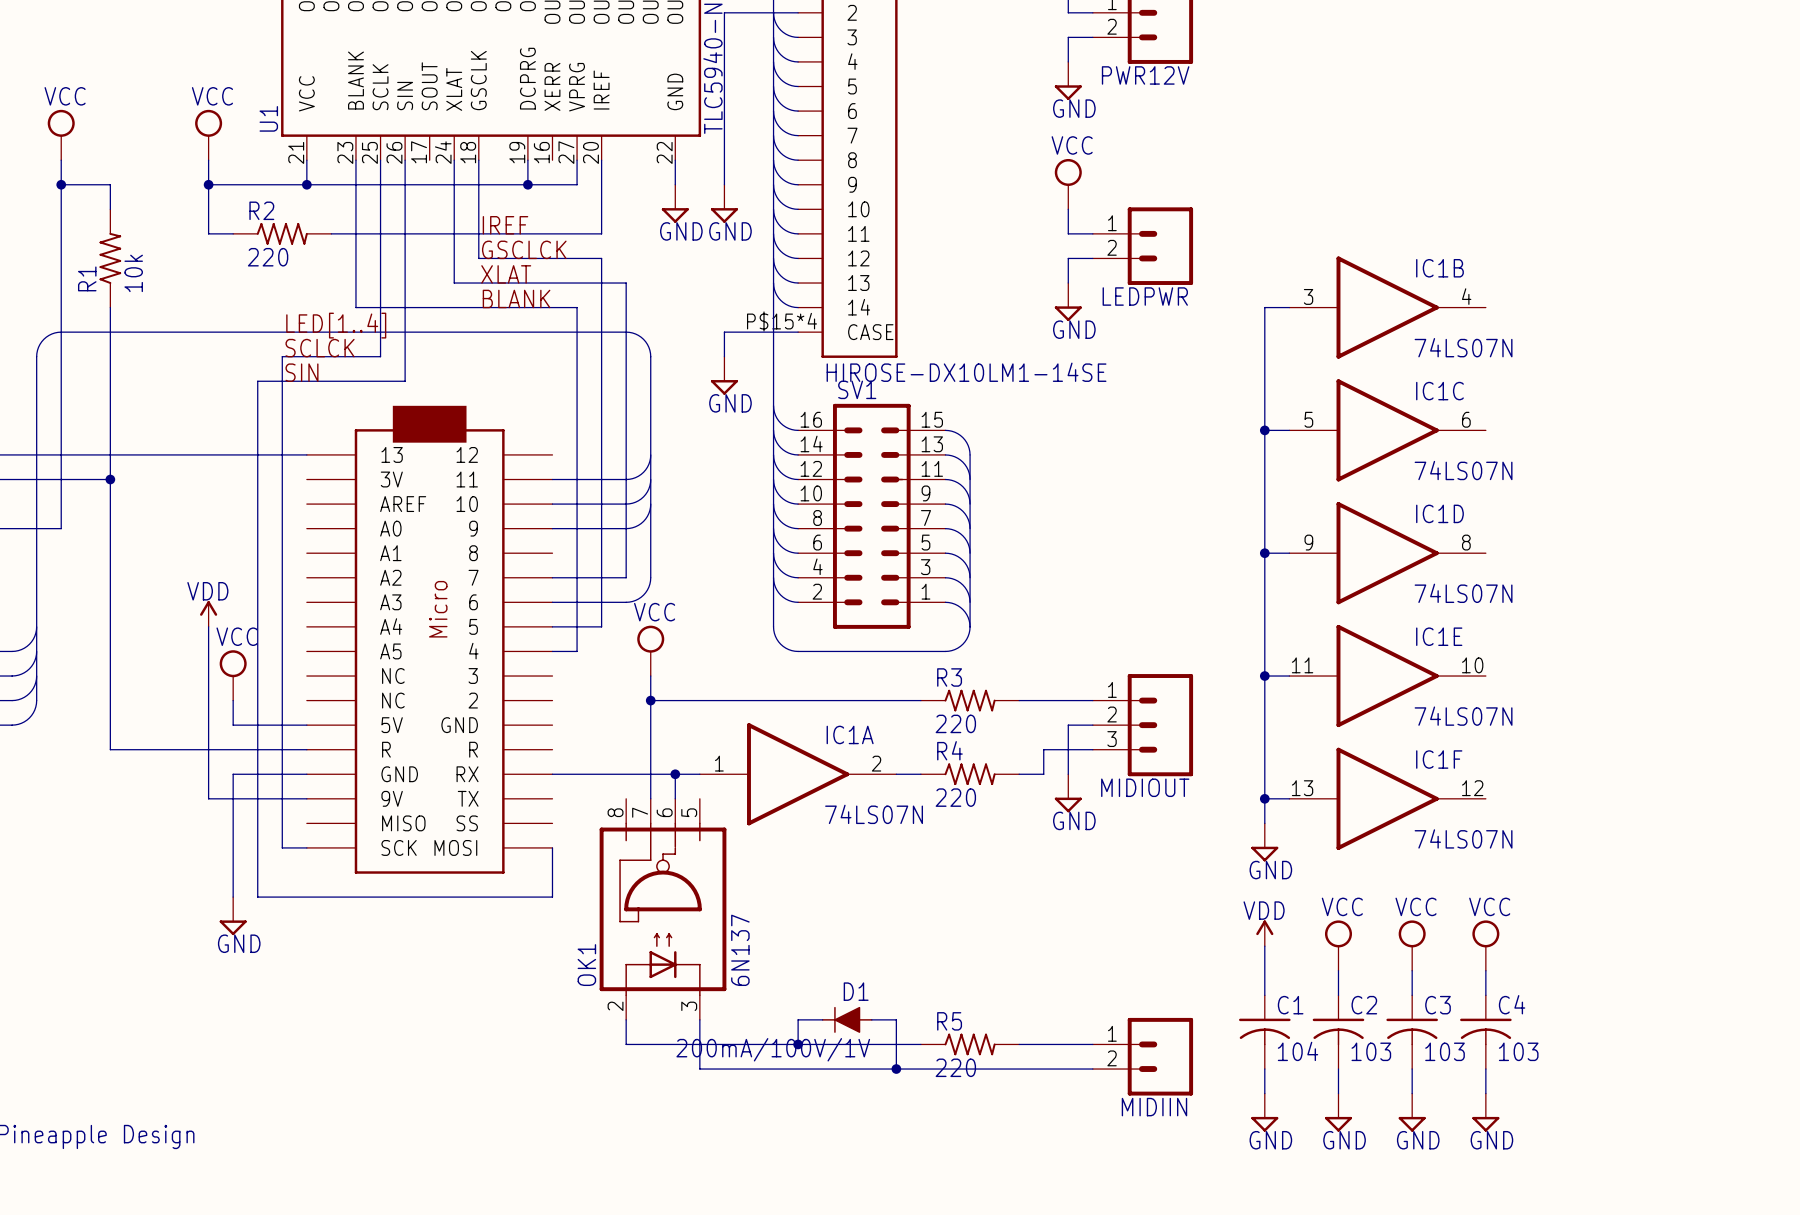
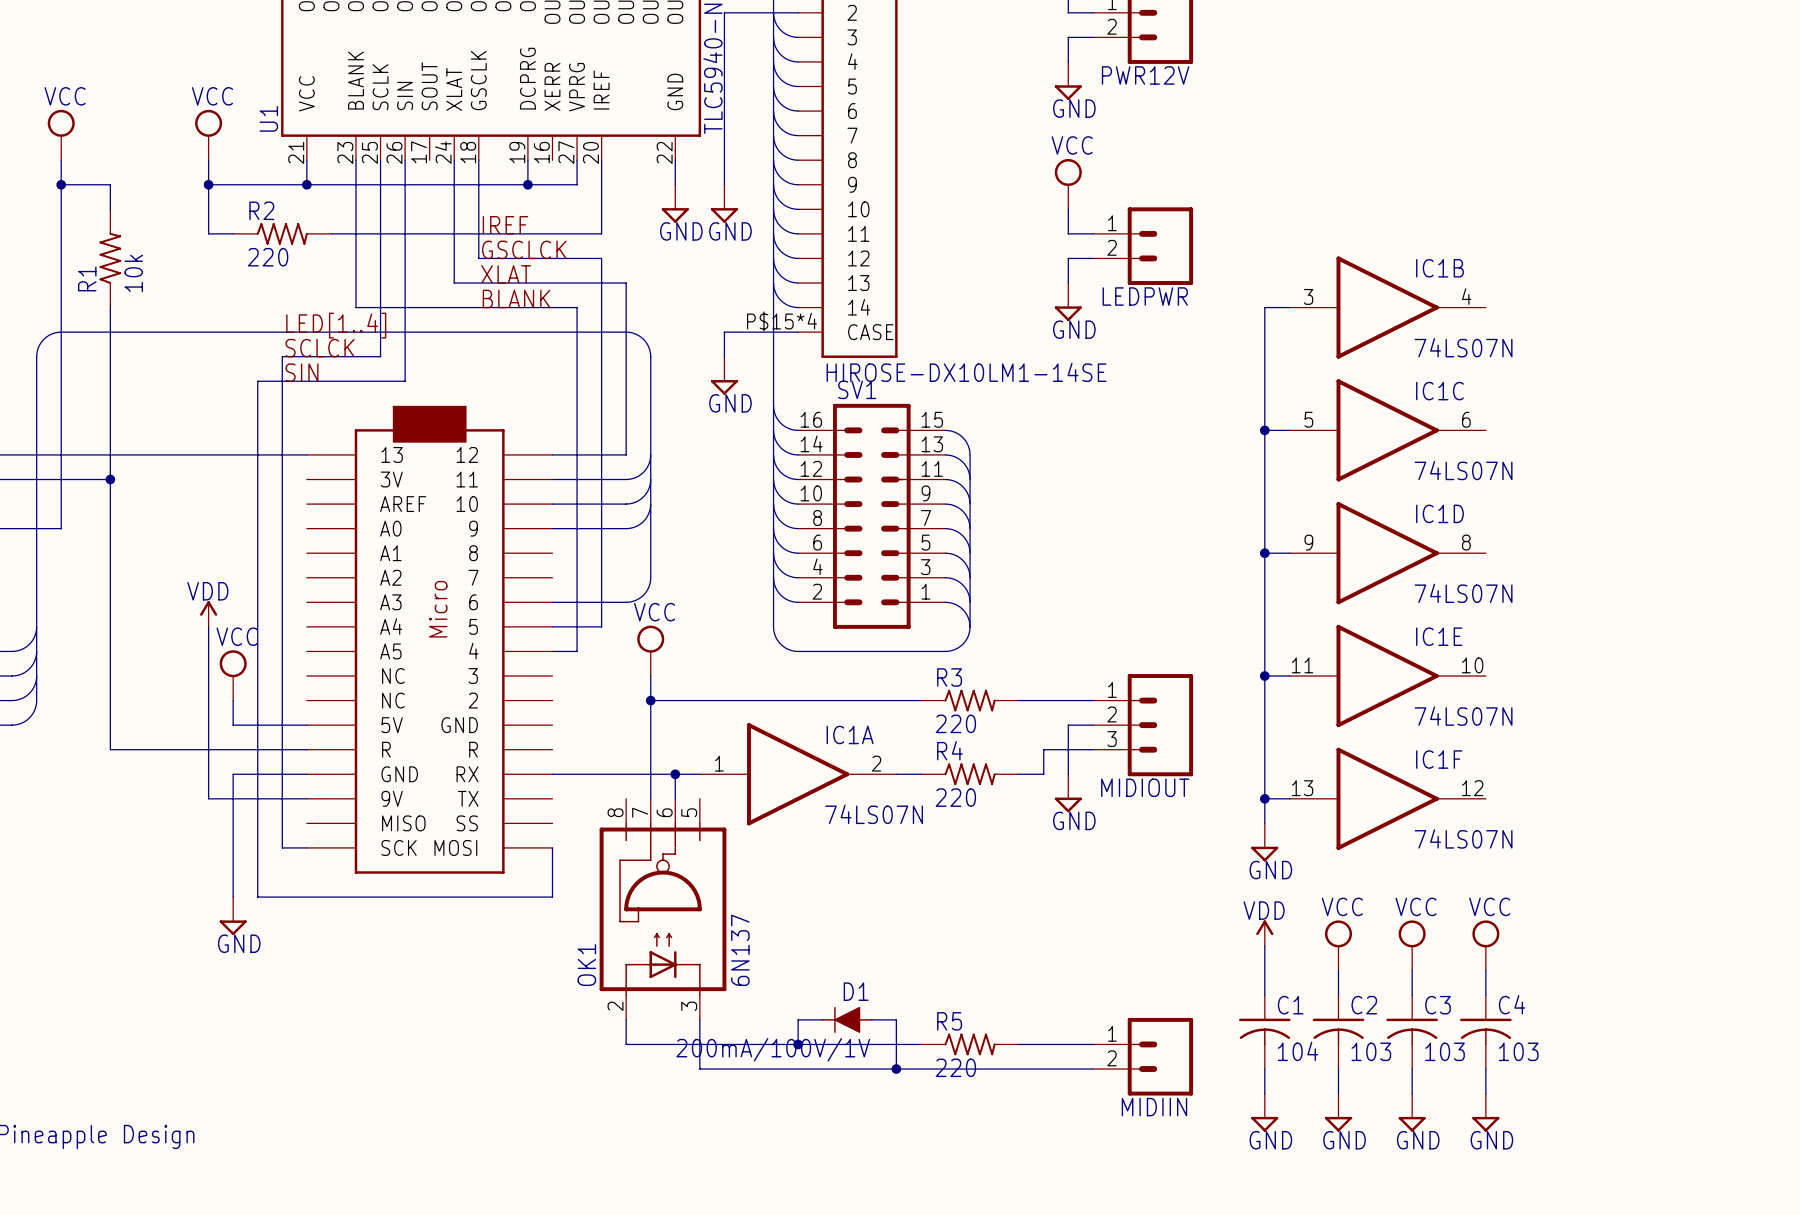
wire: (626, 454) (626, 577) (552, 577) -> (626, 454) (552, 454)

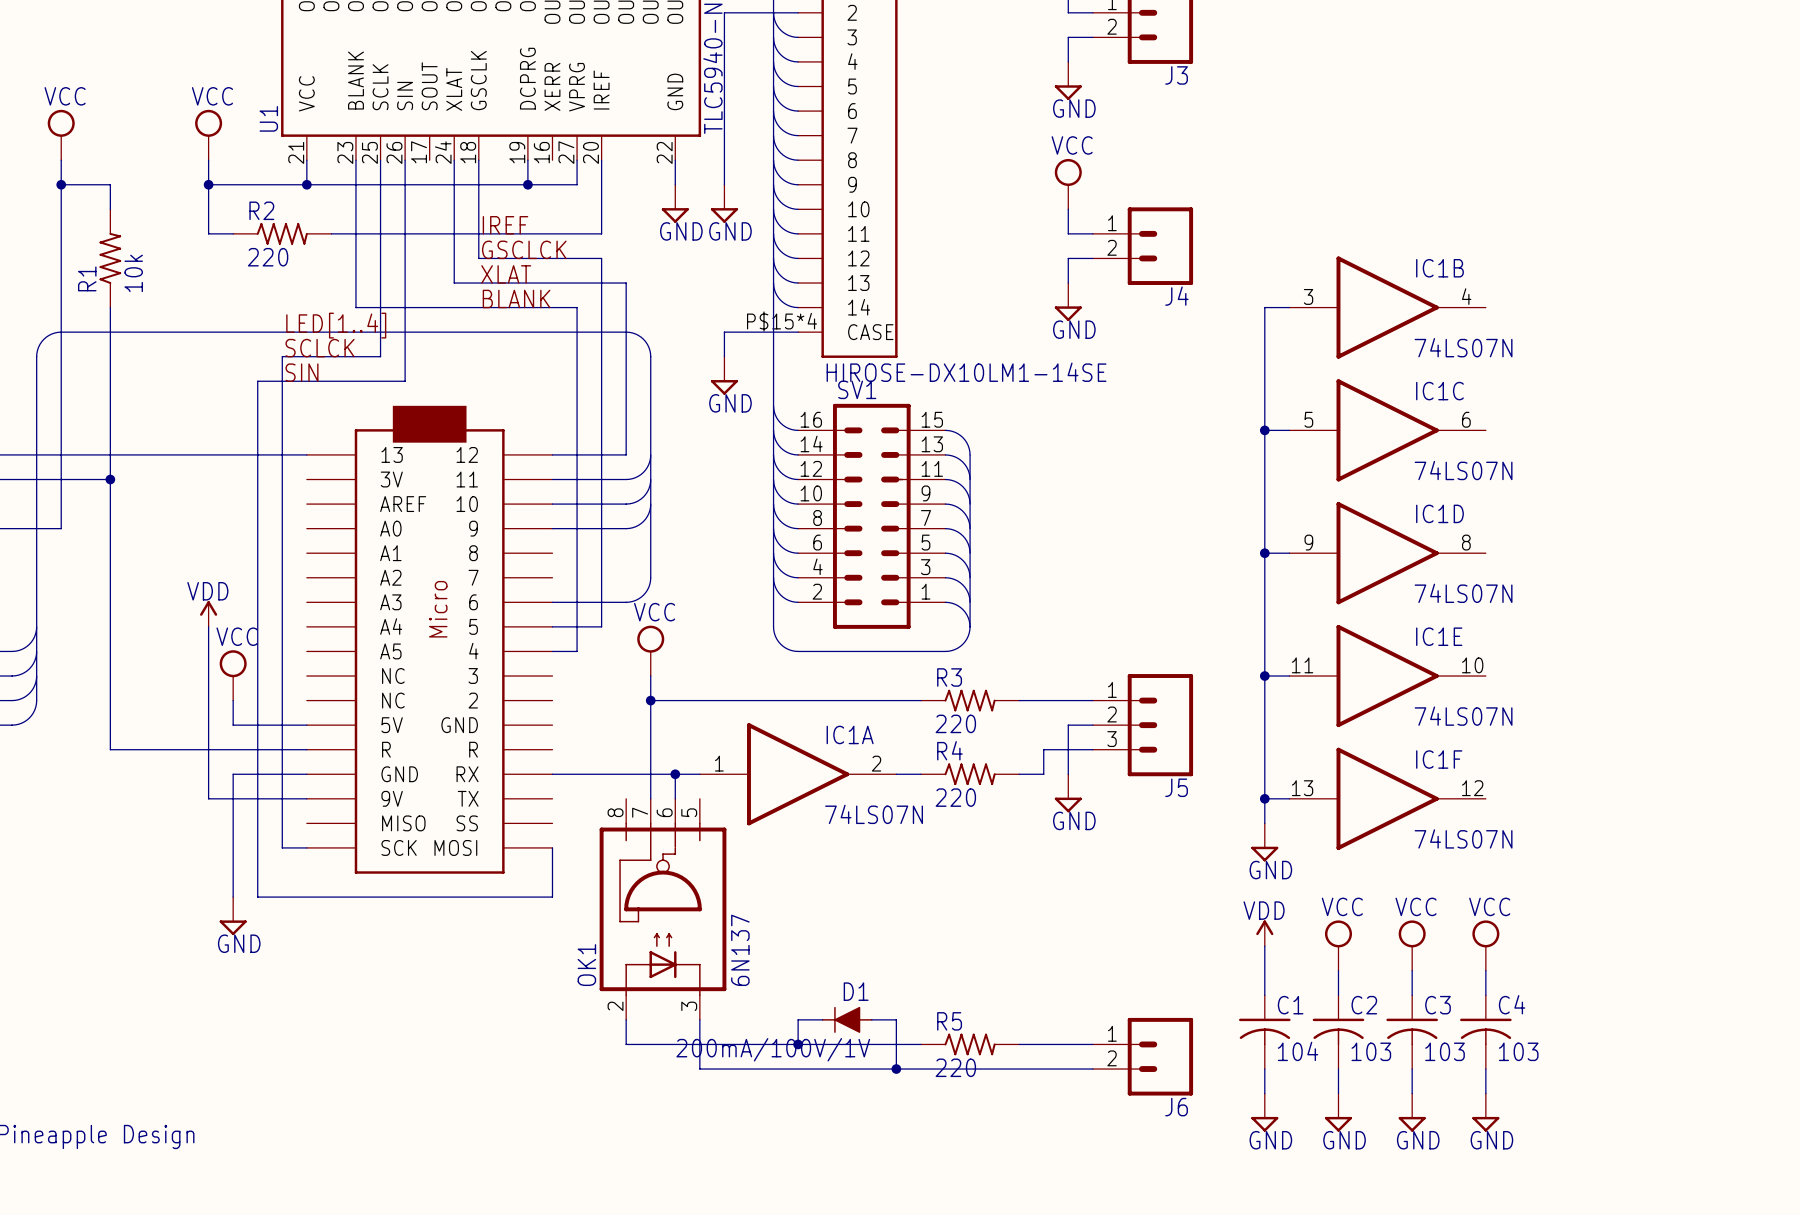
PWR12V name: PWR12V (1145, 75) -> J3 (1176, 75)
LEDPWR name: LEDPWR (1145, 296) -> J4 (1176, 296)
MIDIOUT name: MIDIOUT (1145, 787) -> J5 (1176, 787)
MIDIIN name: MIDIIN (1154, 1107) -> J6 (1176, 1107)

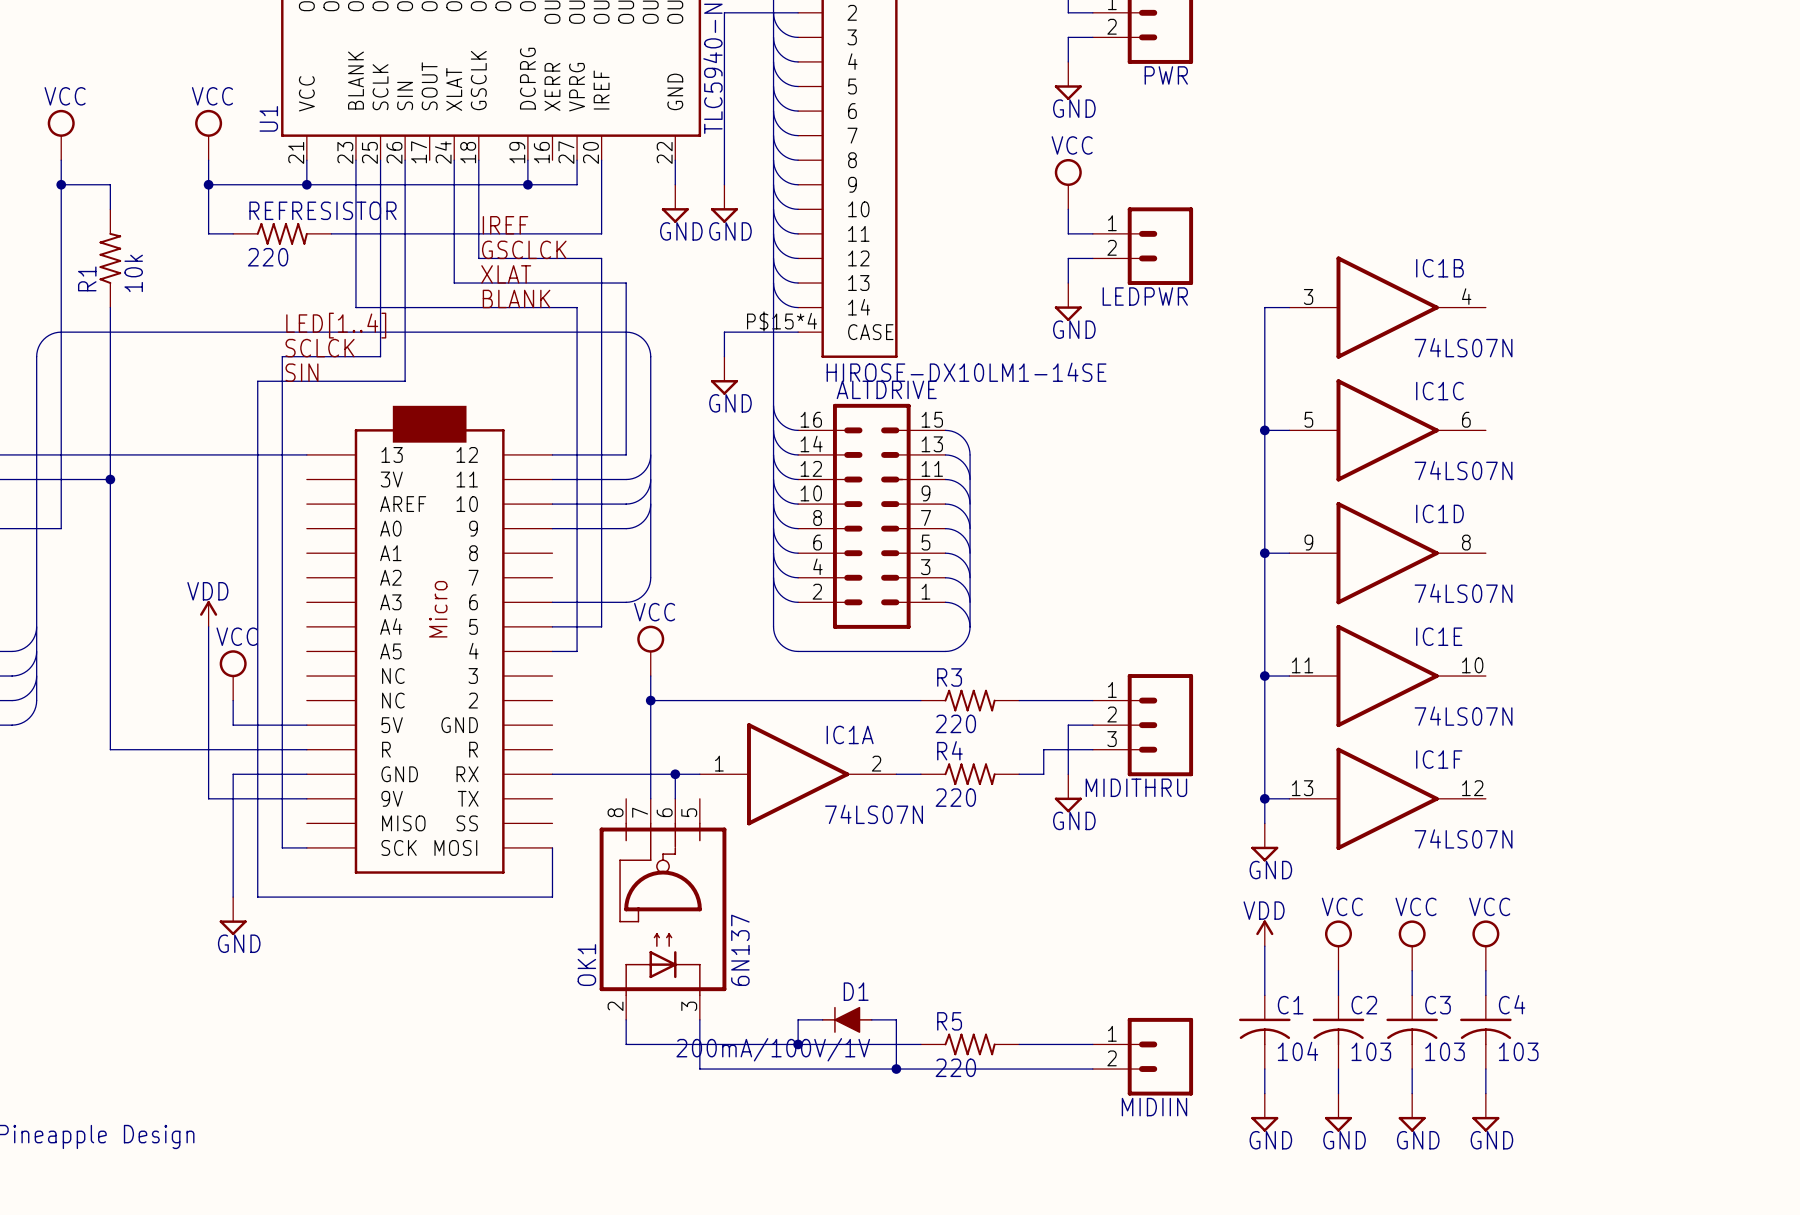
J3 name: J3 (1176, 75) -> PWR (1166, 75)
R2 name: R2 (261, 210) -> REFRESISTOR (322, 210)
J4 name: J4 (1176, 296) -> LEDPWR (1145, 296)
SV1 name: SV1 (857, 389) -> ALTDRIVE (886, 389)
J5 name: J5 (1176, 787) -> MIDITHRU (1136, 787)
J6 name: J6 (1176, 1107) -> MIDIIN (1154, 1107)

